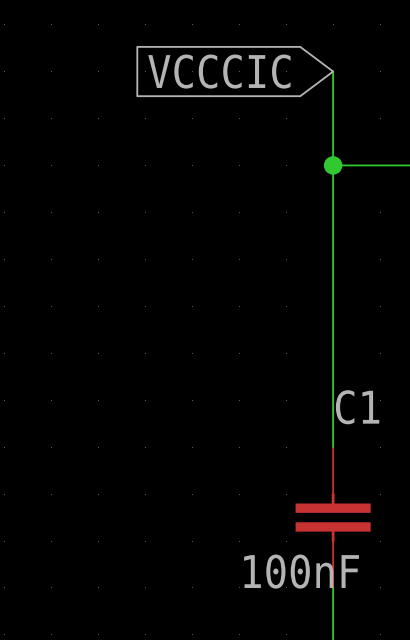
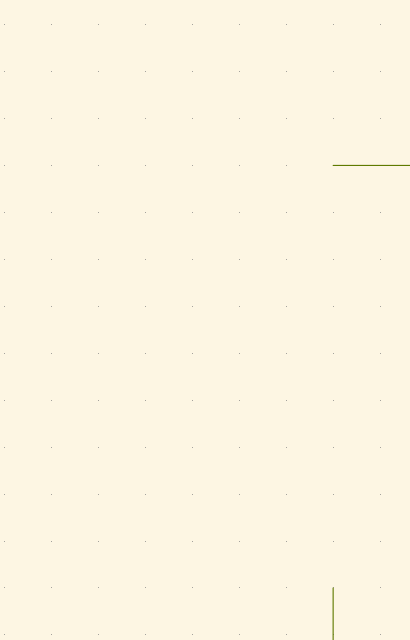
global label: VCCCIC (219, 71) -> none
wire: (333, 71) (333, 447) -> none
junction: (333, 165) -> none
C1: 100nF (333, 517) -> none

